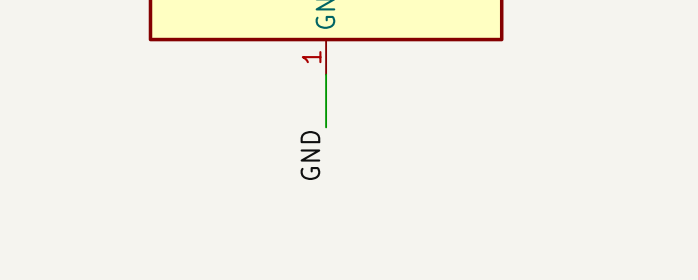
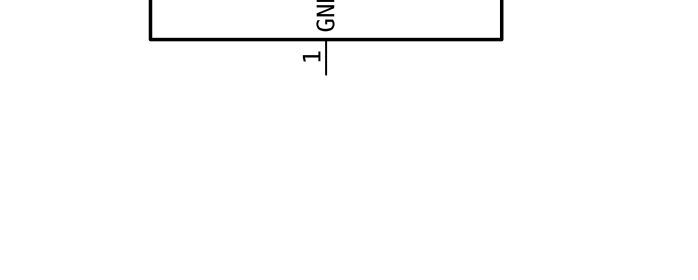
wire: (326, 74) (326, 127) -> none
label: GND (310, 155) -> none

